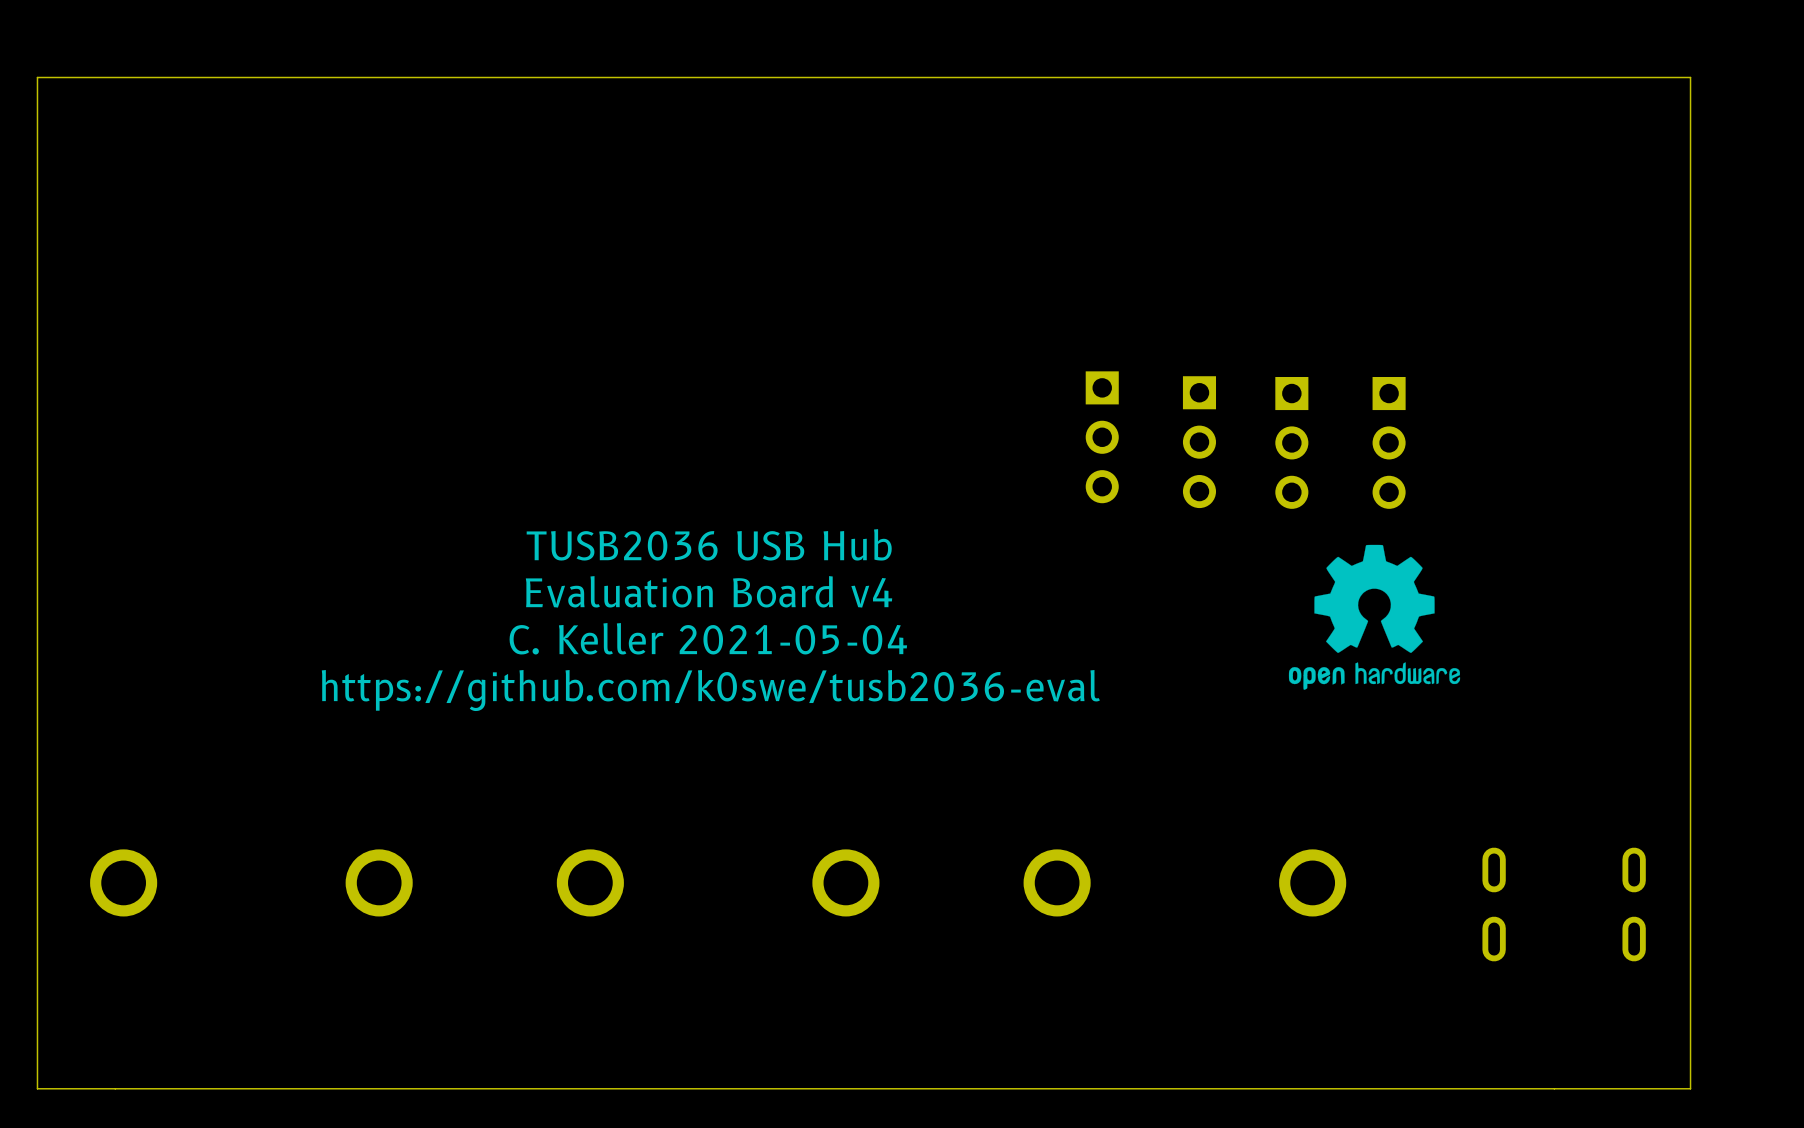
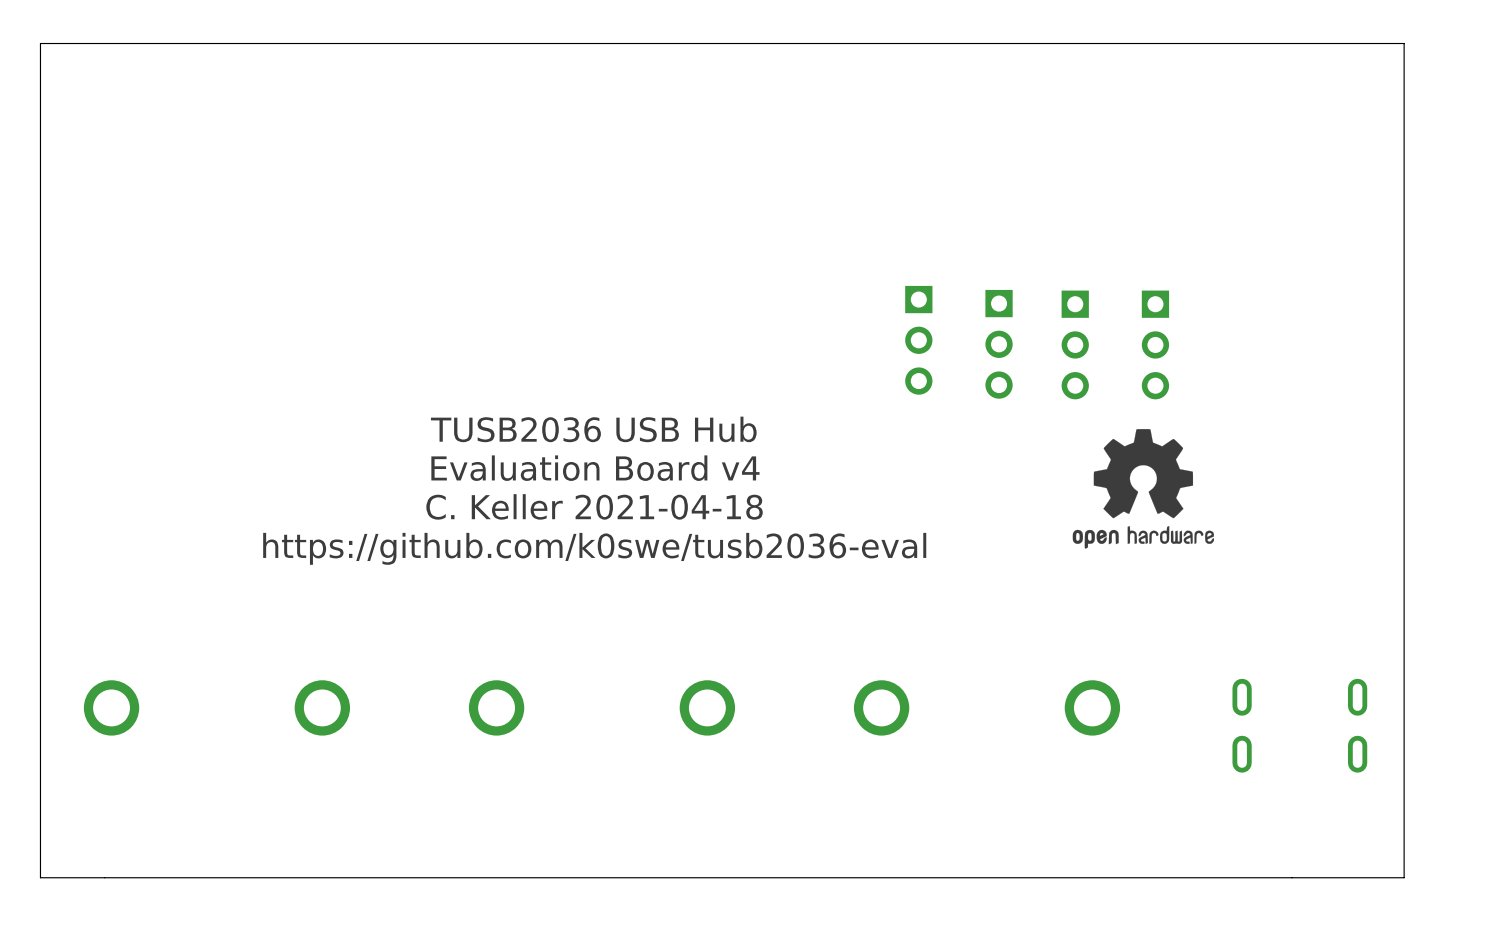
text: C. Keller 2021-05-04 (708, 638) -> C. Keller 2021-04-18 (594, 506)

